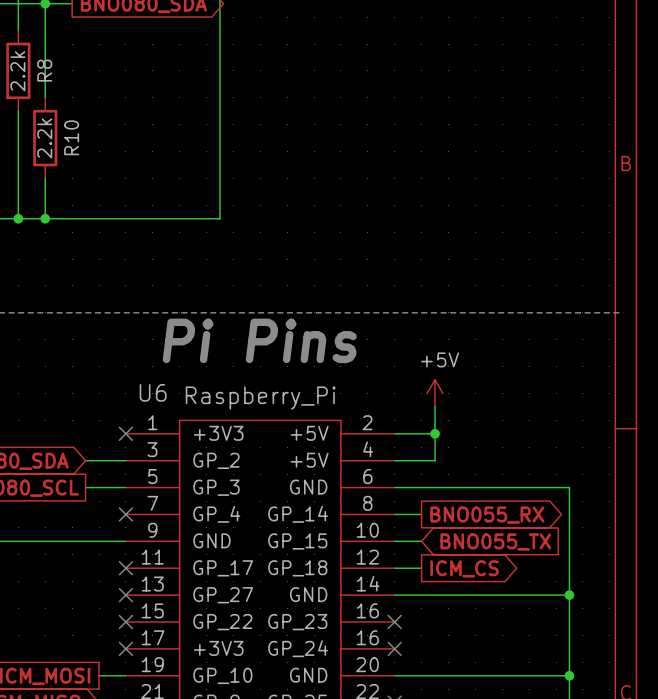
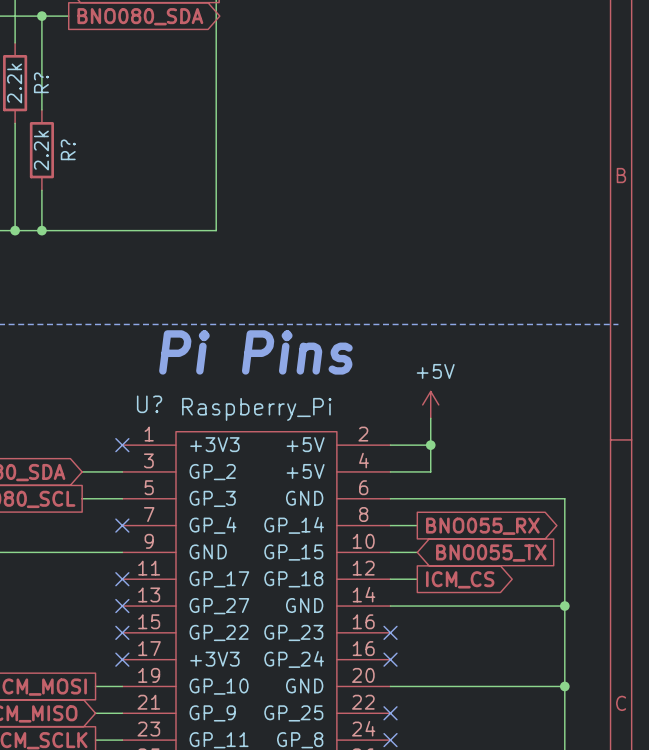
R8 name: R8 (44, 70) -> R? (41, 82)
R10 name: R10 (71, 137) -> R? (68, 149)
U6 name: U6 (153, 392) -> U? (149, 404)

